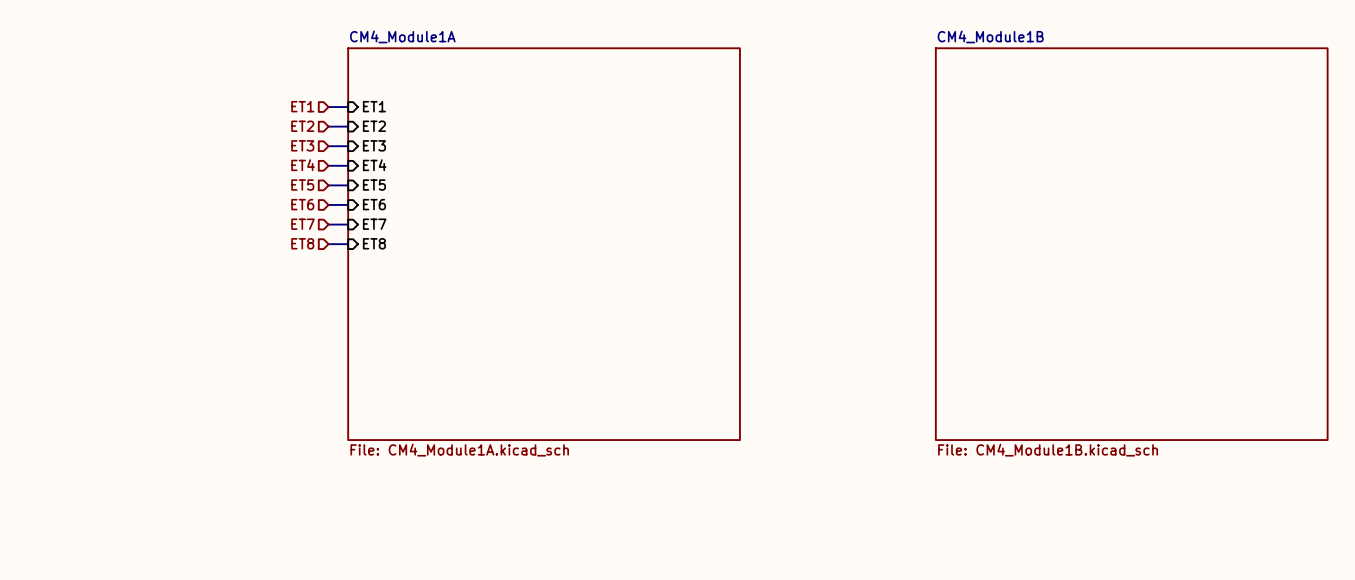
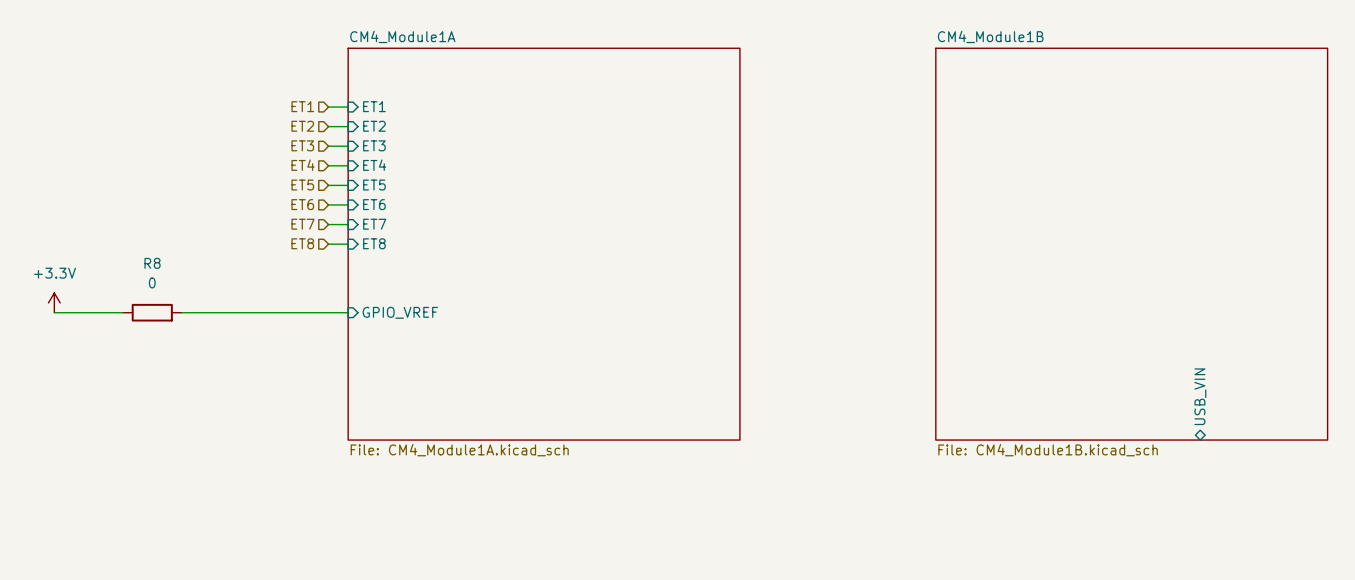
power symbol: none -> +3.3V (54, 302)
wire: none -> (54, 312) (122, 312)
R8: none -> 0 (152, 312)
wire: none -> (181, 312) (348, 312)
sheet pin: none -> GPIO_VREF (400, 312)
sheet pin: none -> USB_VIN (1200, 396)

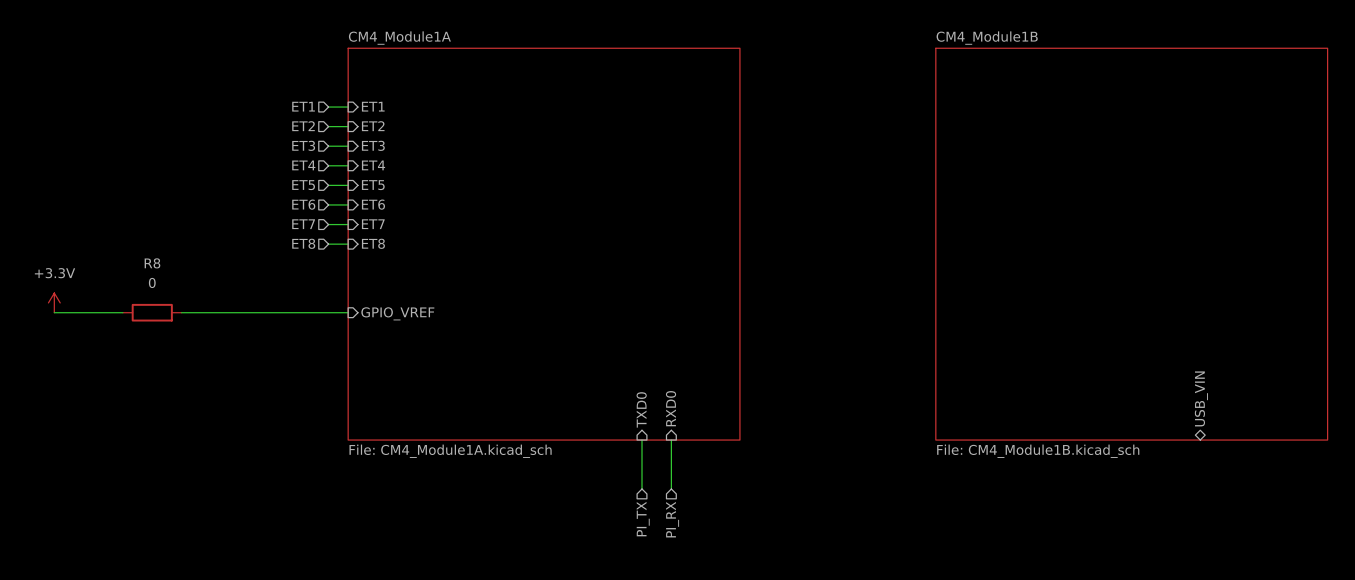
sheet pin: none -> RXD0 (671, 408)
sheet pin: none -> TXD0 (641, 409)
wire: none -> (642, 440) (642, 489)
wire: none -> (671, 440) (671, 489)
hierarchical label: none -> PI_TX (643, 519)
hierarchical label: none -> PI_RX (672, 519)

